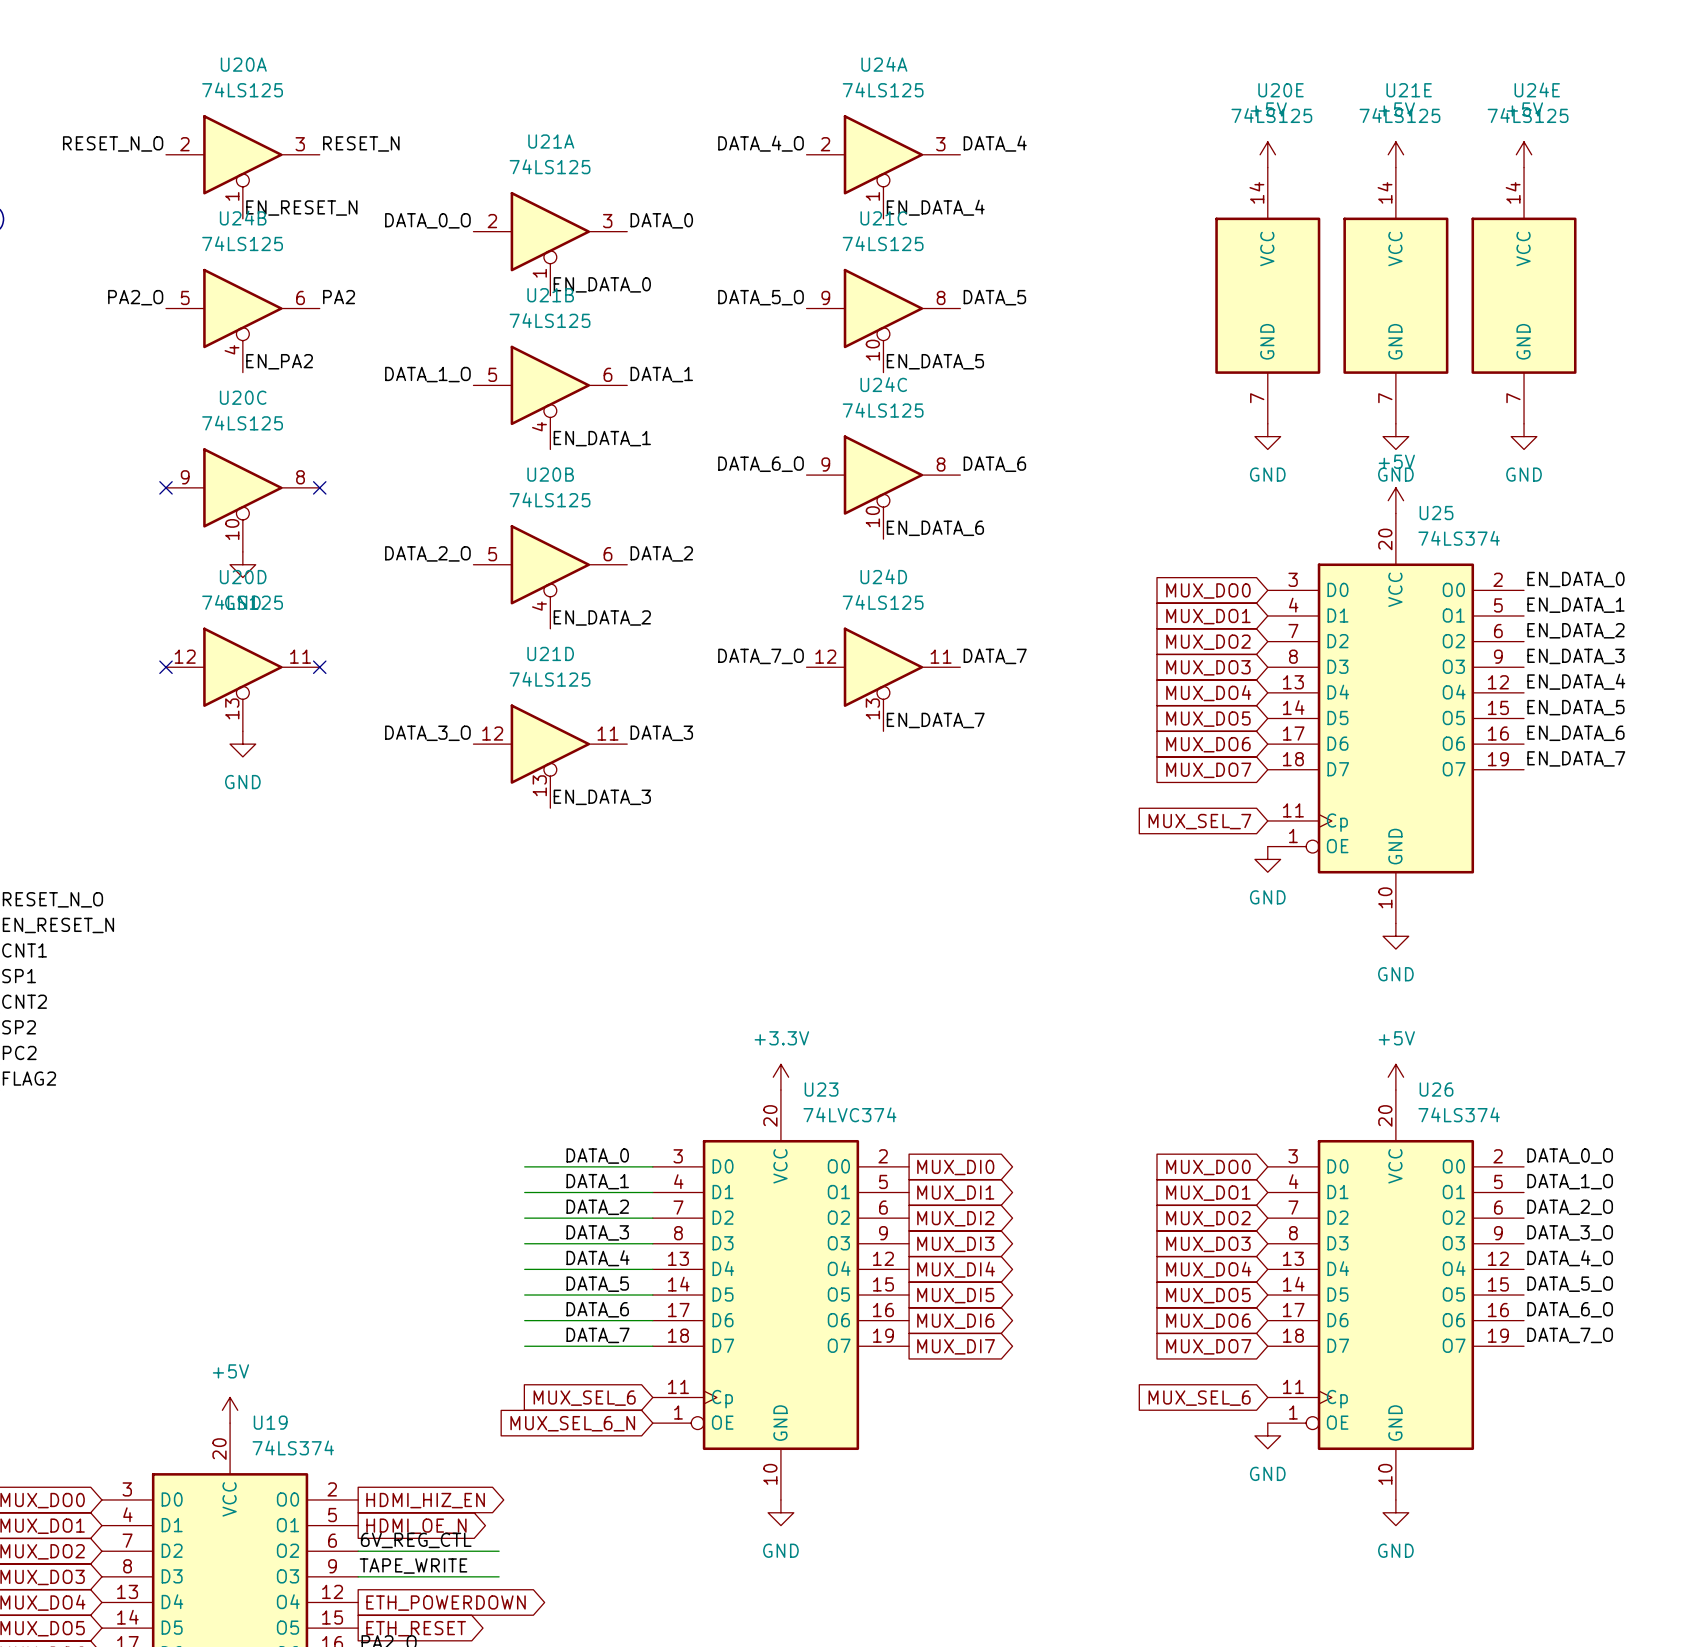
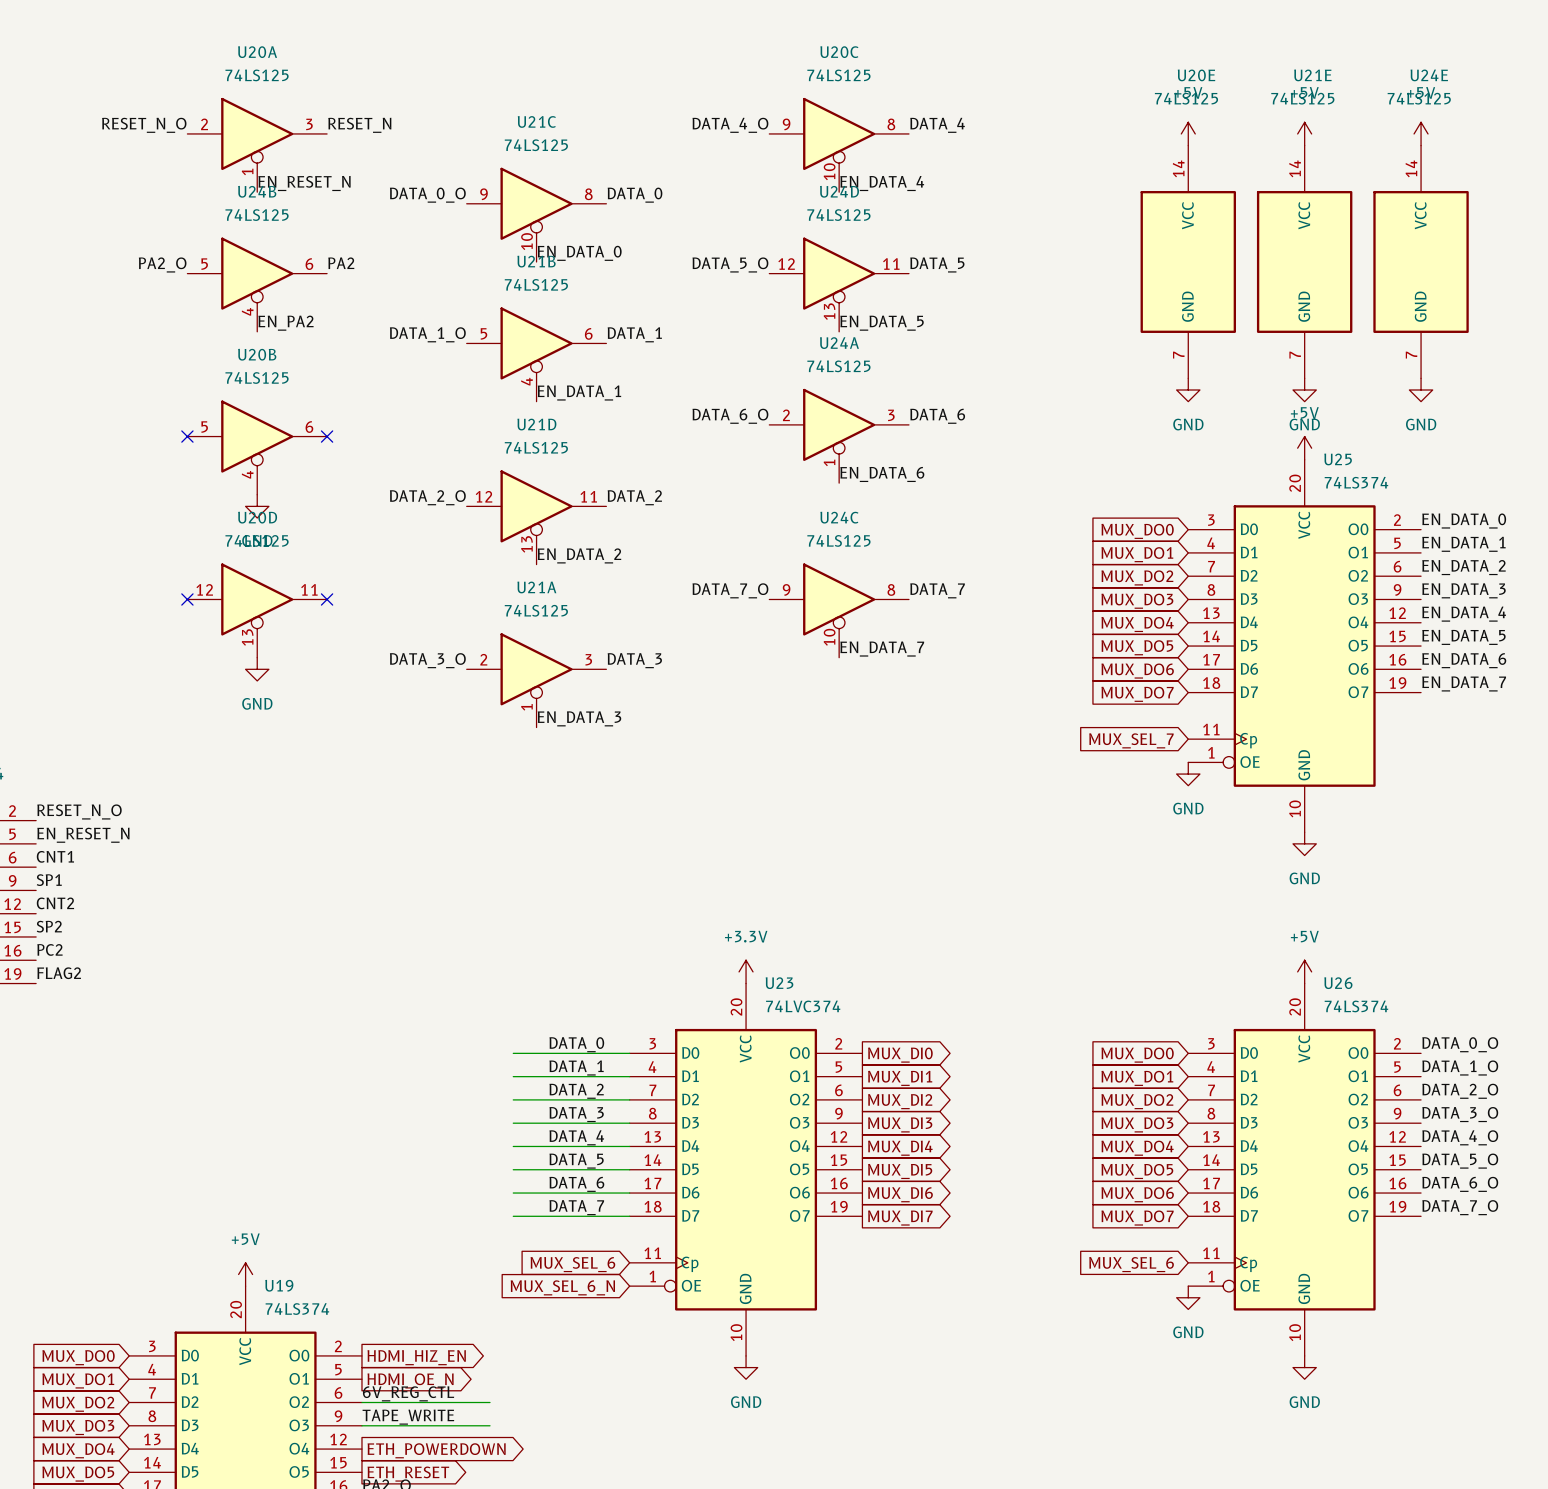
U24A position: (883, 166) -> (839, 435)
U21A position: (550, 243) -> (536, 680)
U21C position: (883, 320) -> (536, 214)
U24C position: (883, 487) -> (839, 610)
U20C position: (242, 500) -> (839, 145)
U20B position: (550, 576) -> (257, 447)
U24D position: (883, 679) -> (839, 284)
U21D position: (550, 756) -> (536, 517)

